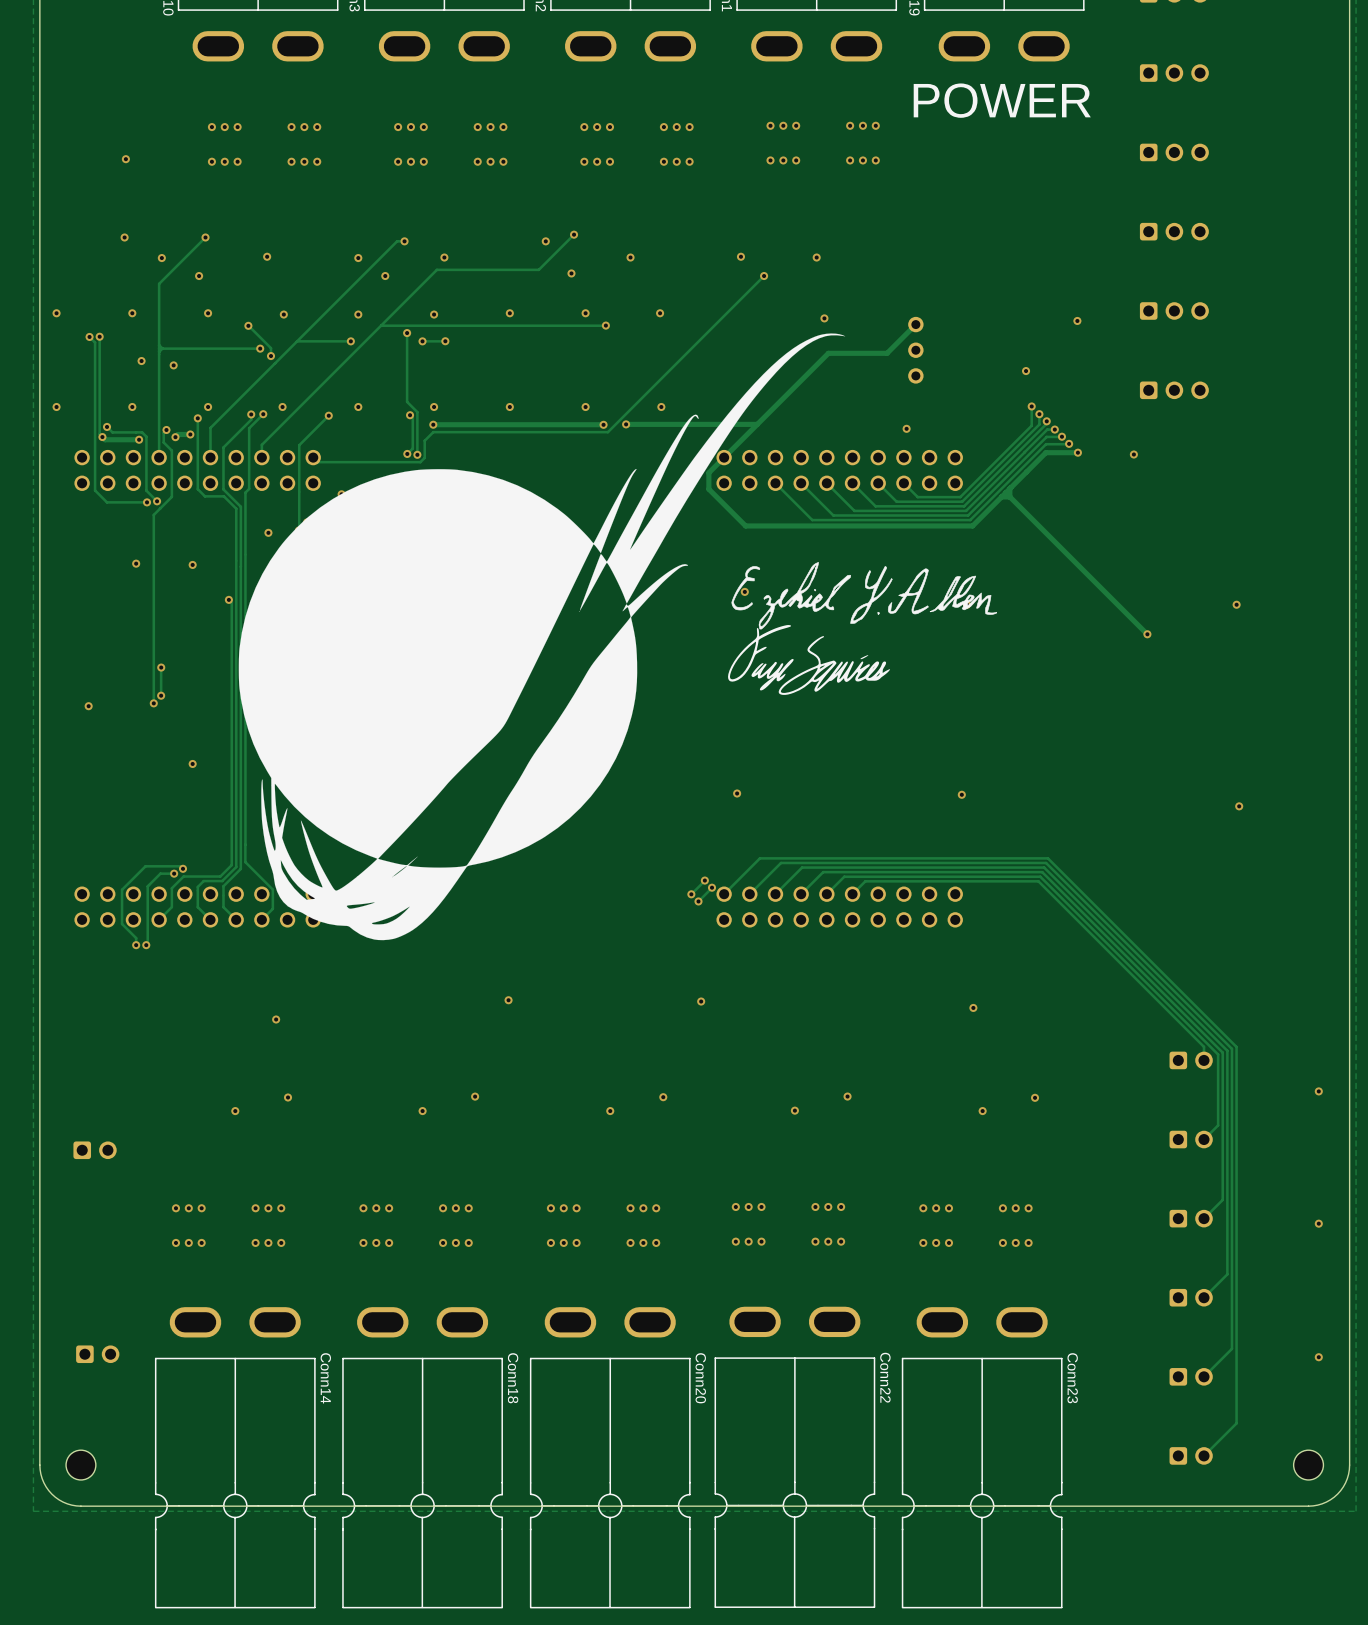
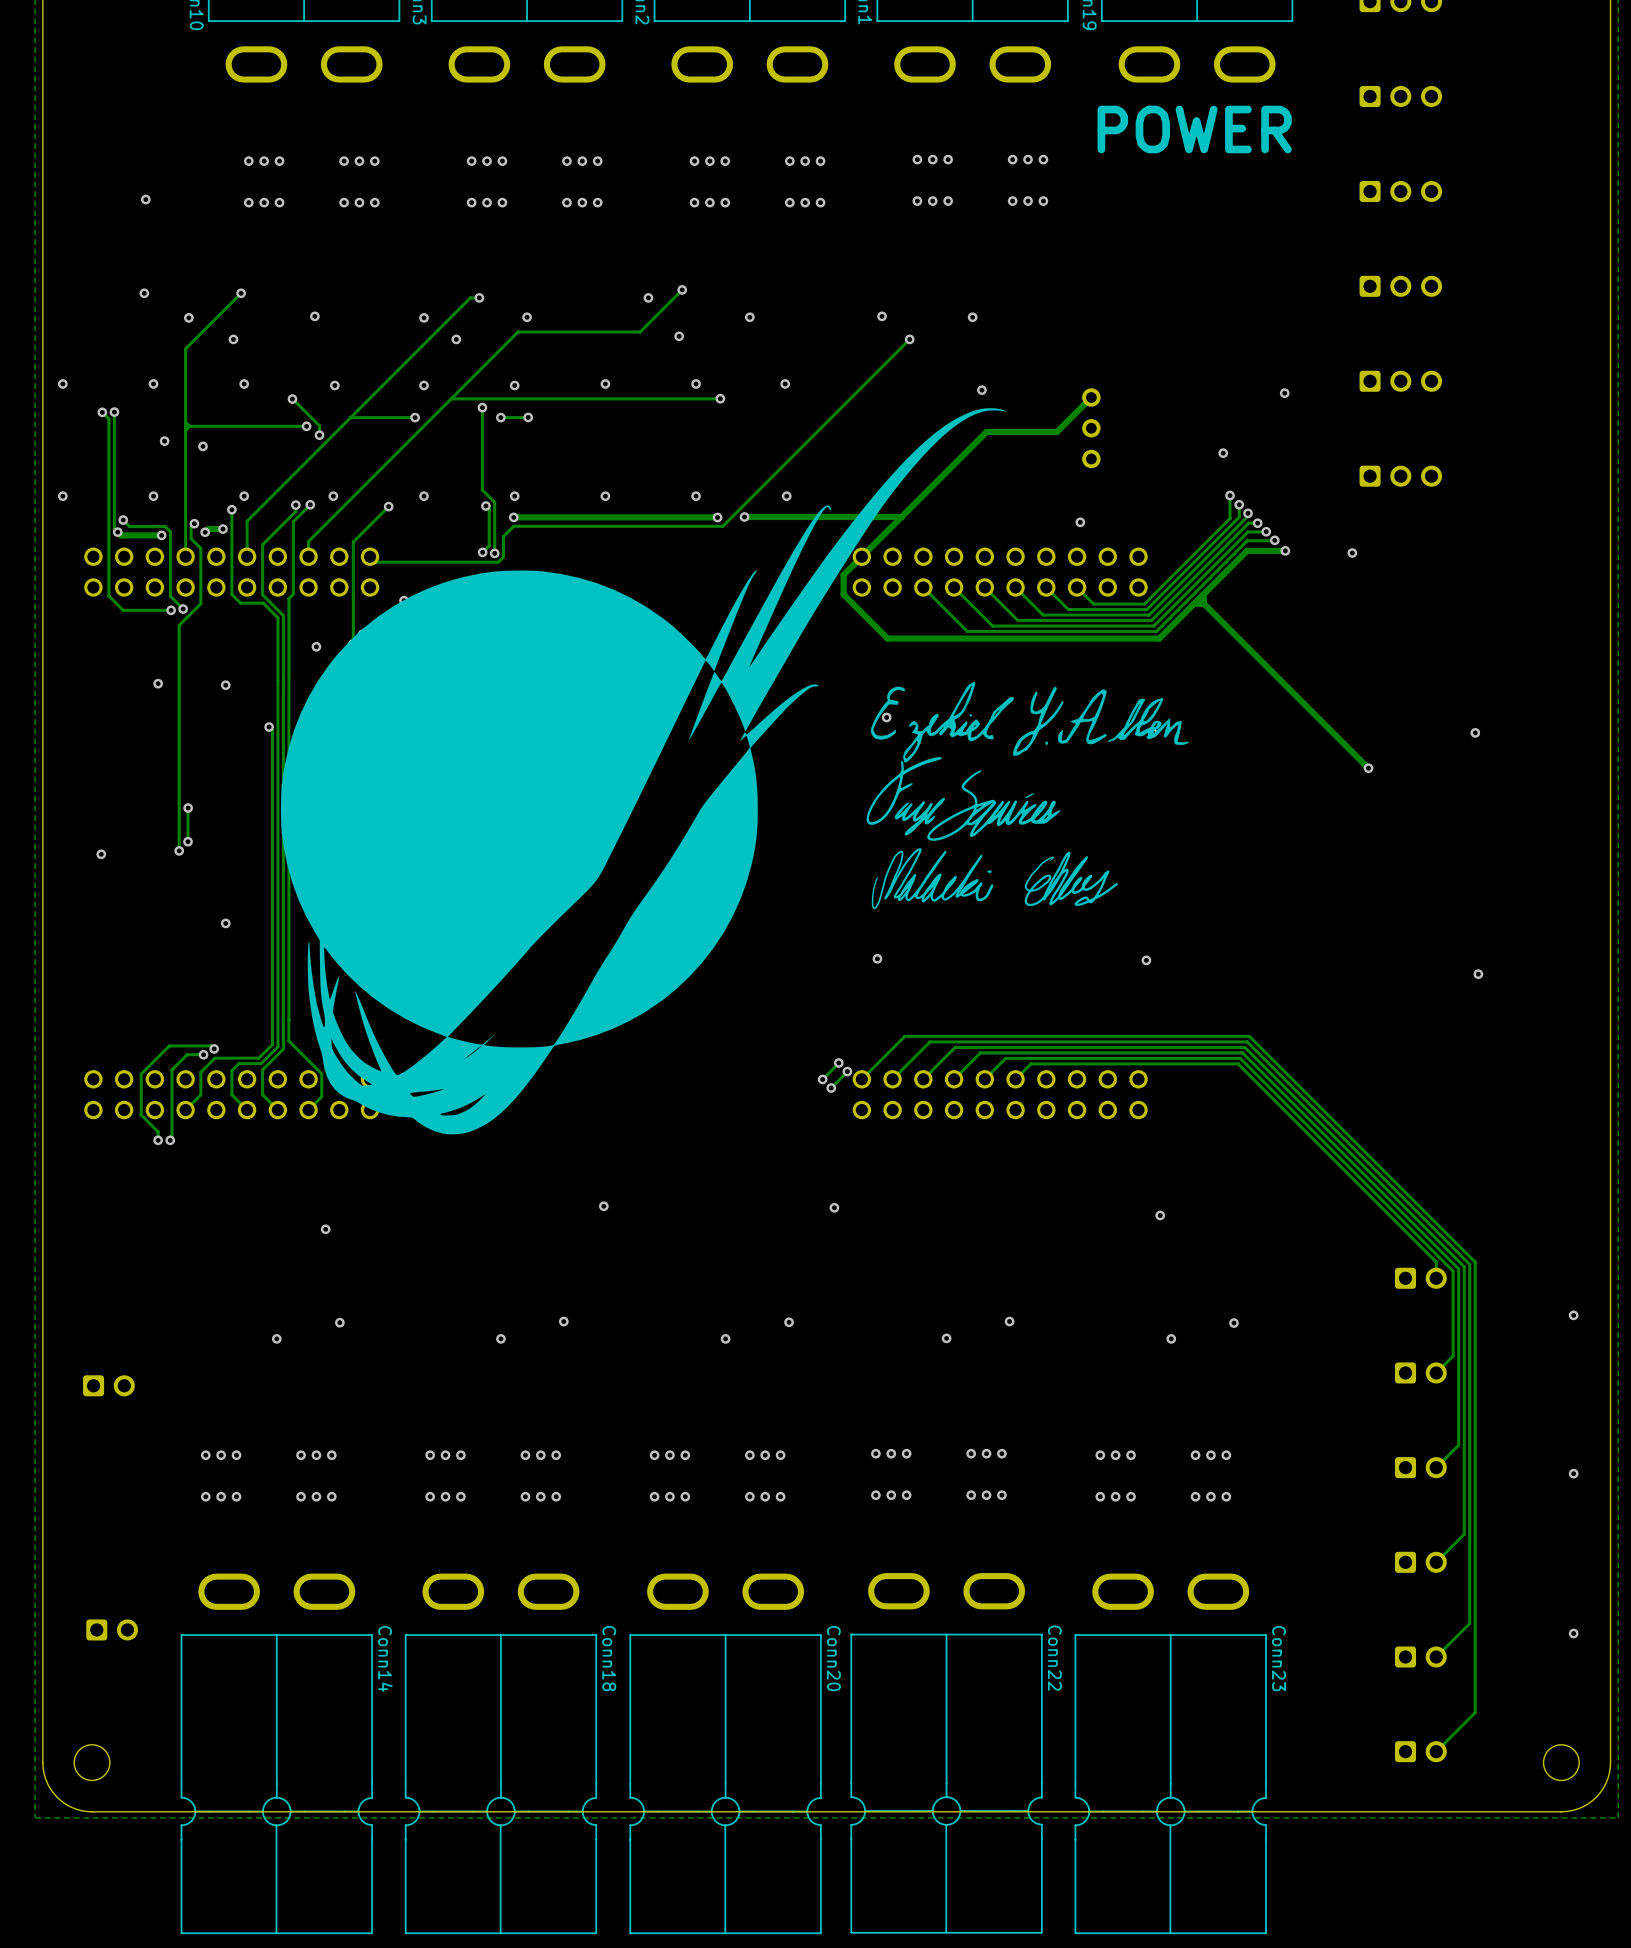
drawing: none -> [871, 848, 1119, 910]

